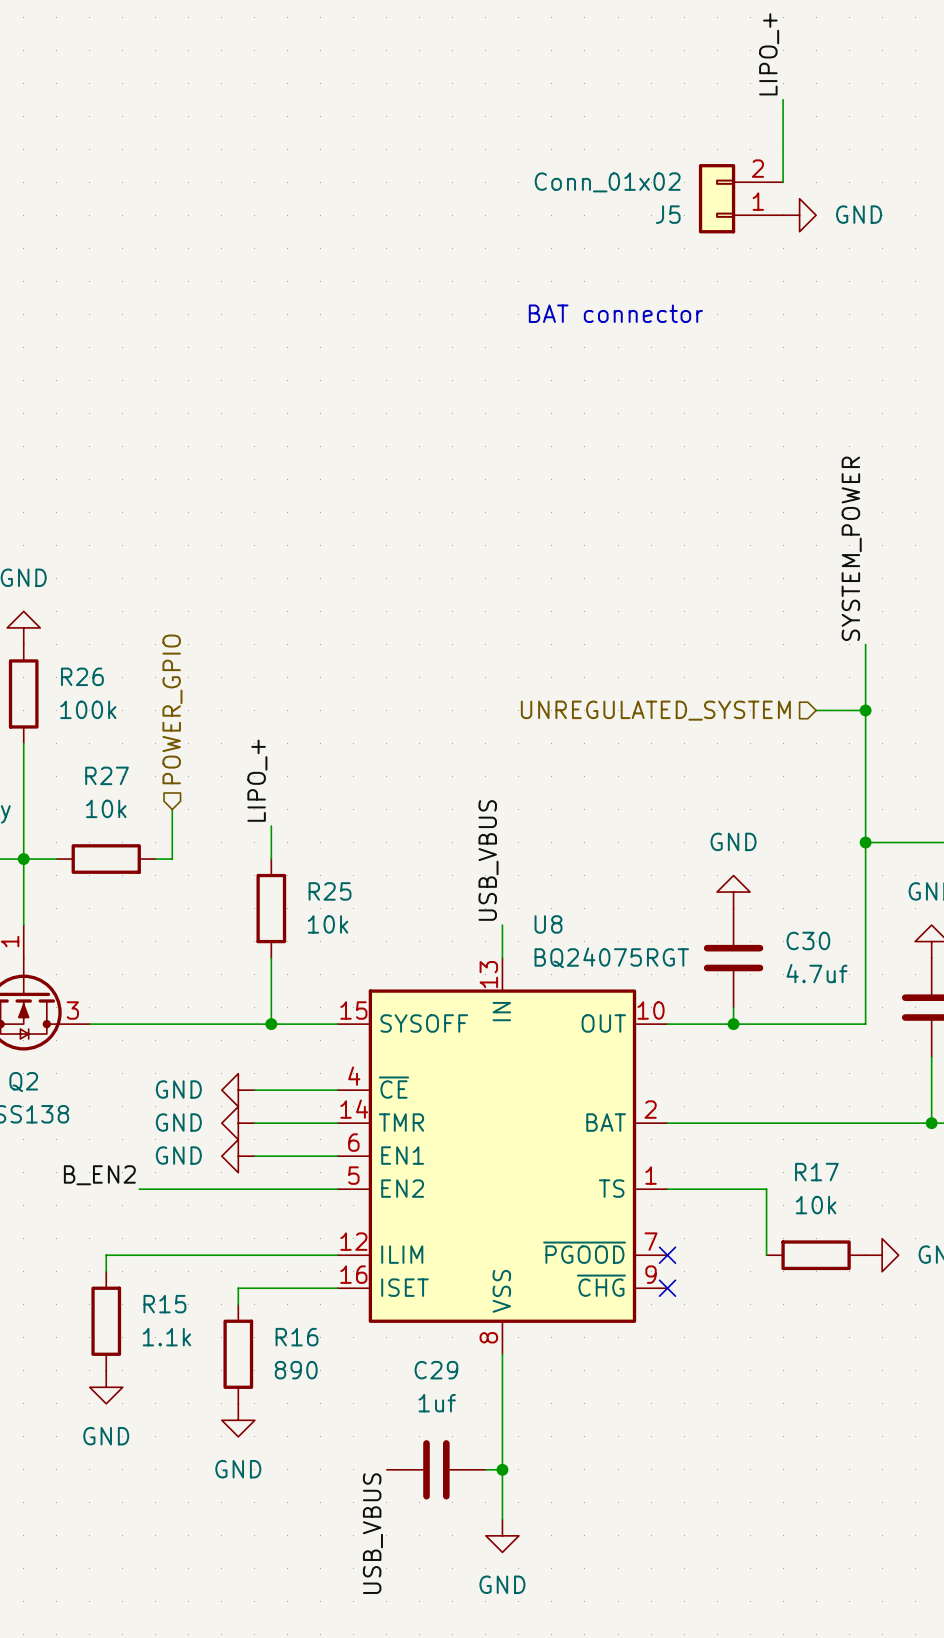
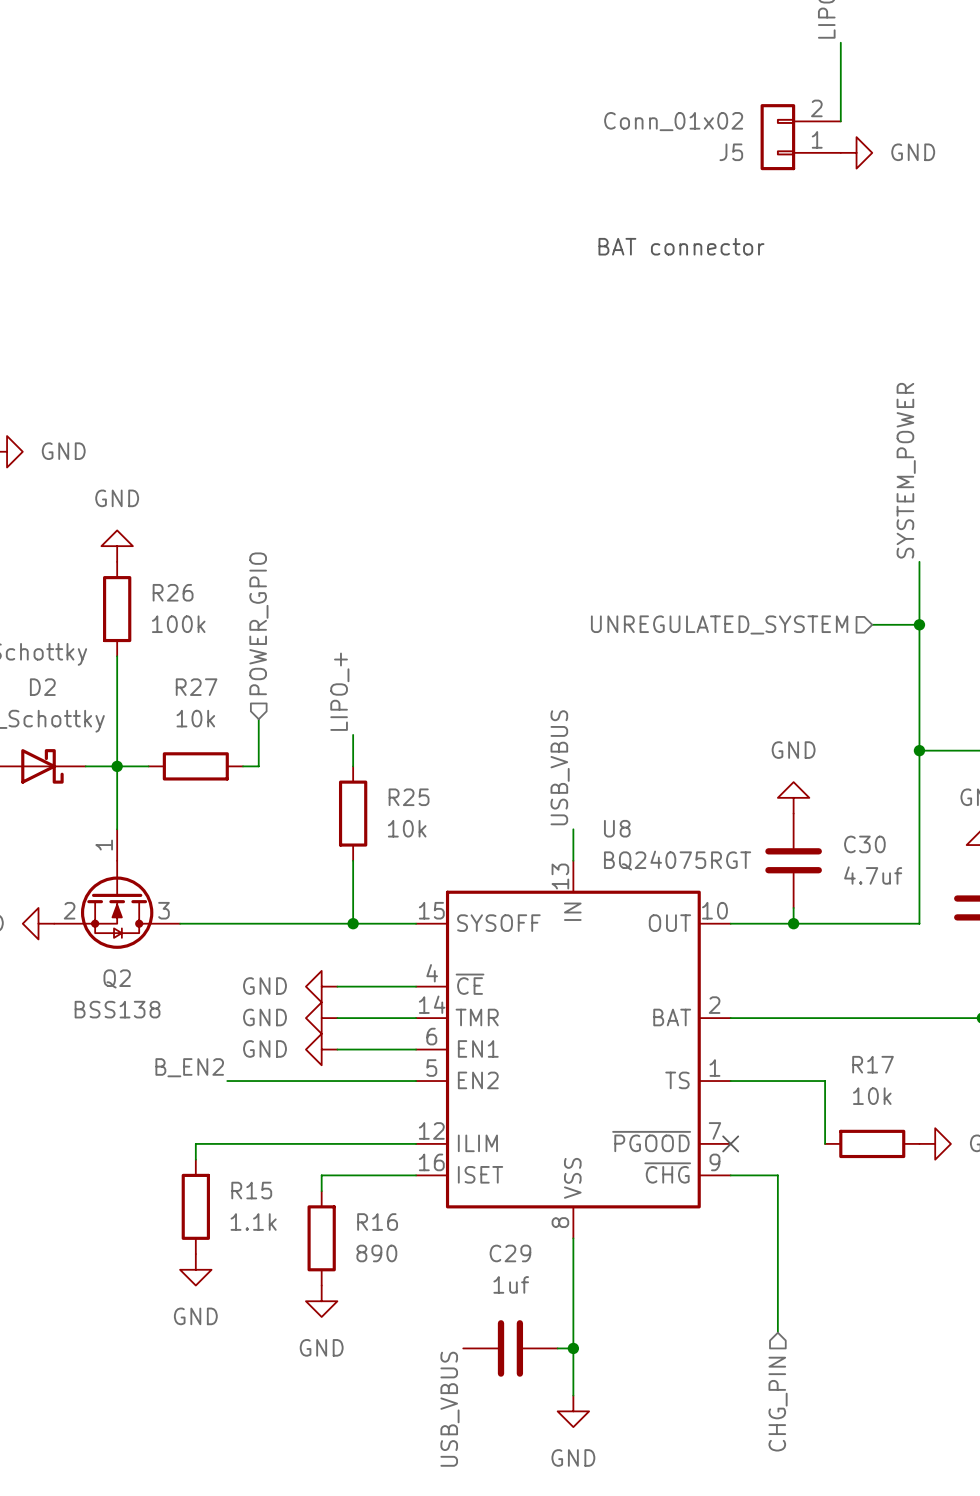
wire: none -> (730, 1175) (777, 1175) (777, 1332)
no-connect mark: (667, 1288) -> none
hierarchical label: none -> CHG_PIN (778, 1404)

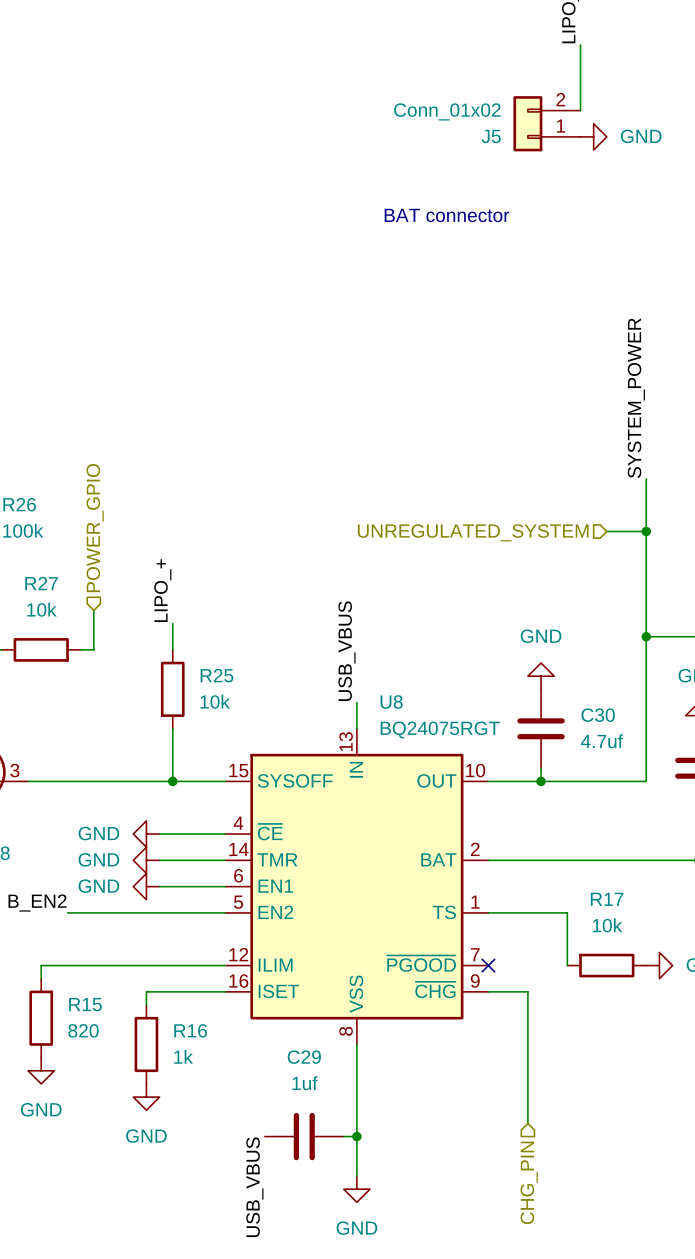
R15 value: 1.1k (253, 1222) -> 820 (83, 1030)
R16 value: 890 (376, 1253) -> 1k (183, 1056)

